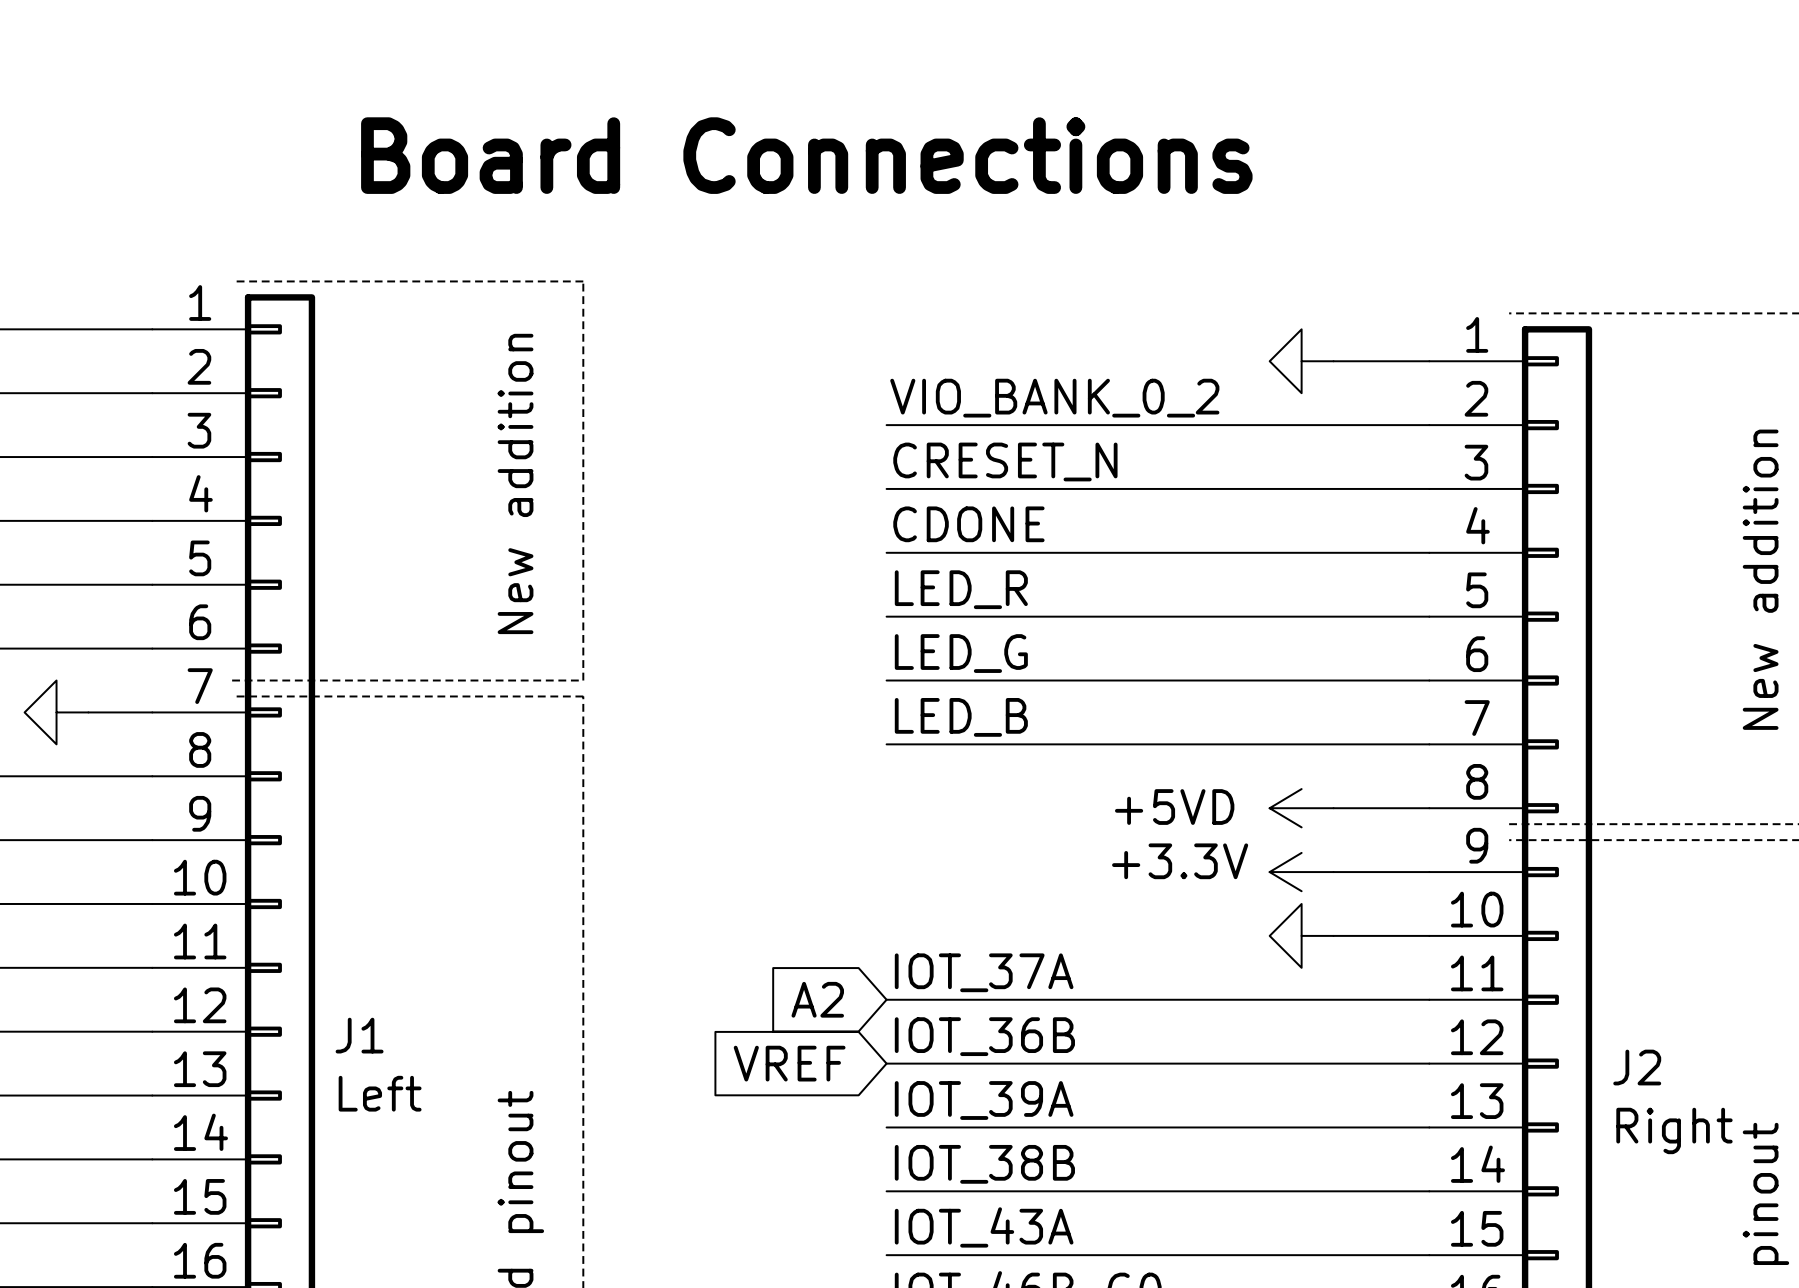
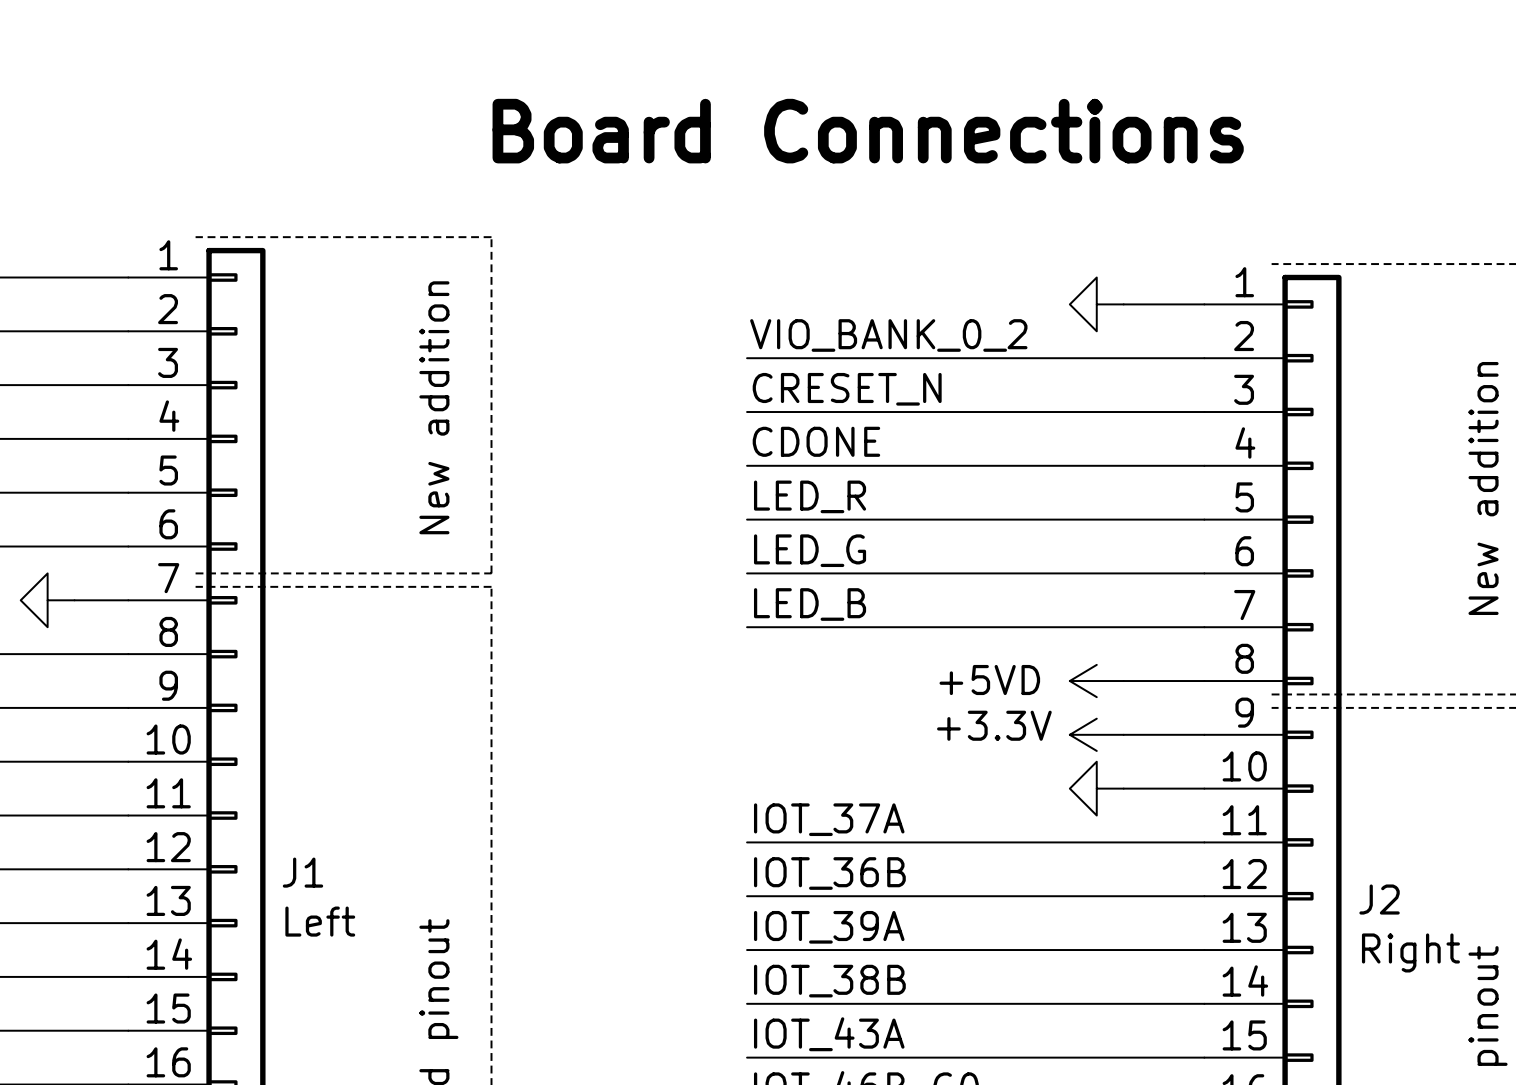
text position: Board Connections (806, 155) -> Board Connections (868, 131)
global label: A2 (817, 999) -> none
global label: VREF (789, 1063) -> none

